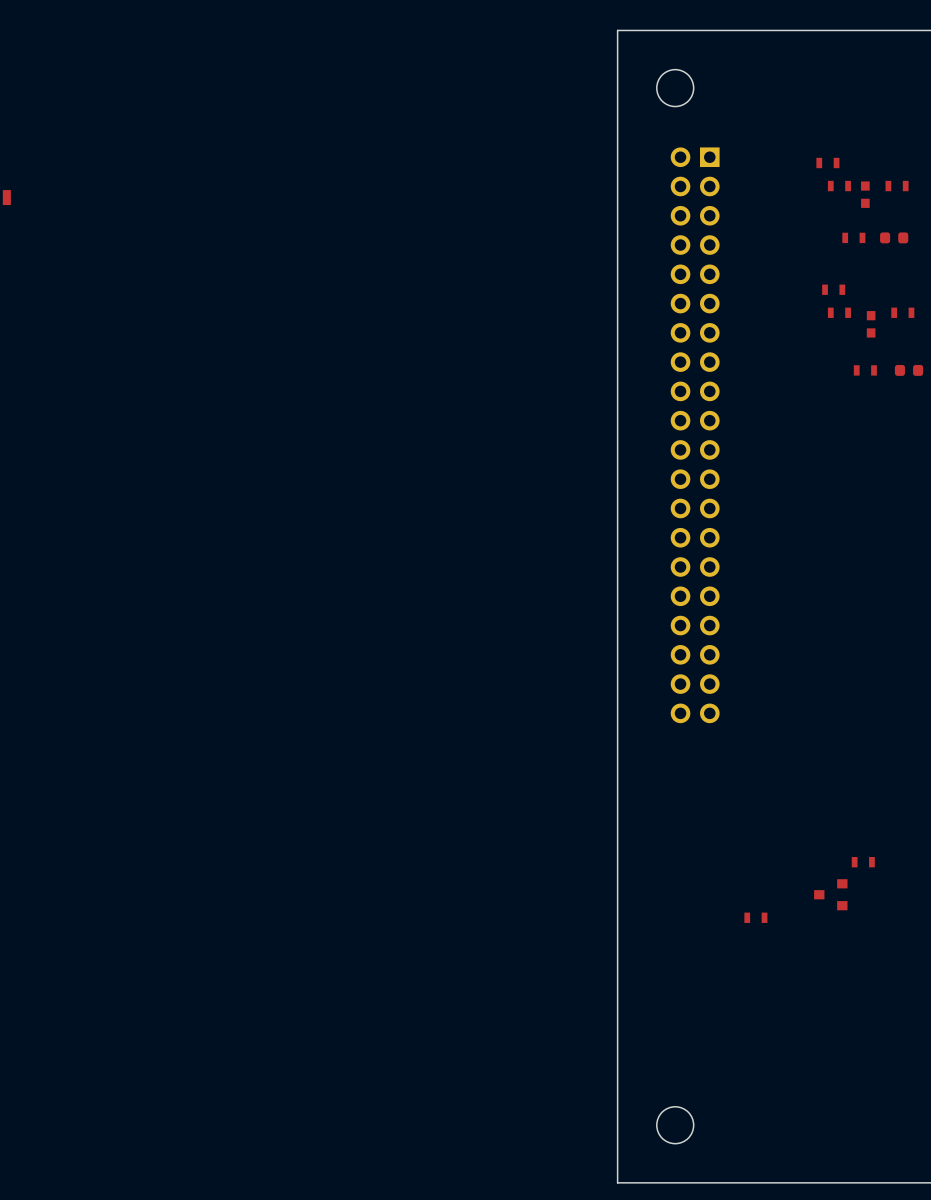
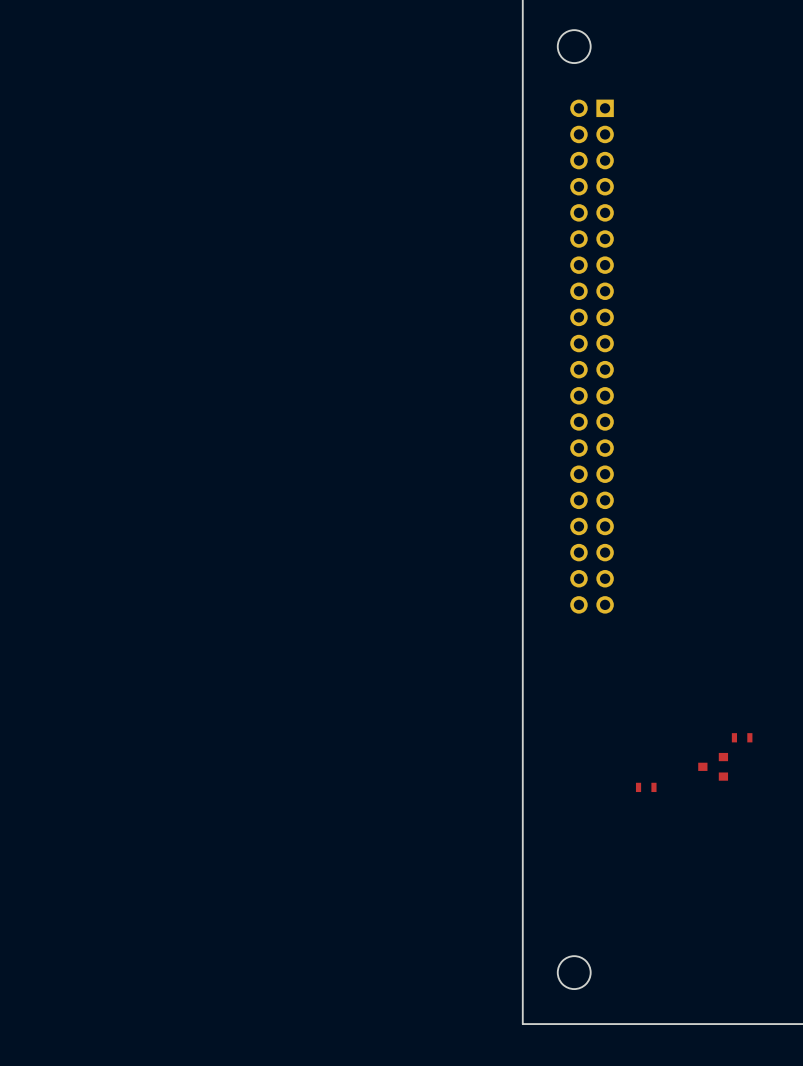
part: (827, 162) -> none
part: (839, 186) -> none
part: (897, 186) -> none
part: (865, 194) -> none
part: (853, 237) -> none
part: (894, 237) -> none
part: (833, 289) -> none
part: (839, 312) -> none
part: (902, 312) -> none
part: (871, 324) -> none
part: (865, 370) -> none
part: (909, 370) -> none

